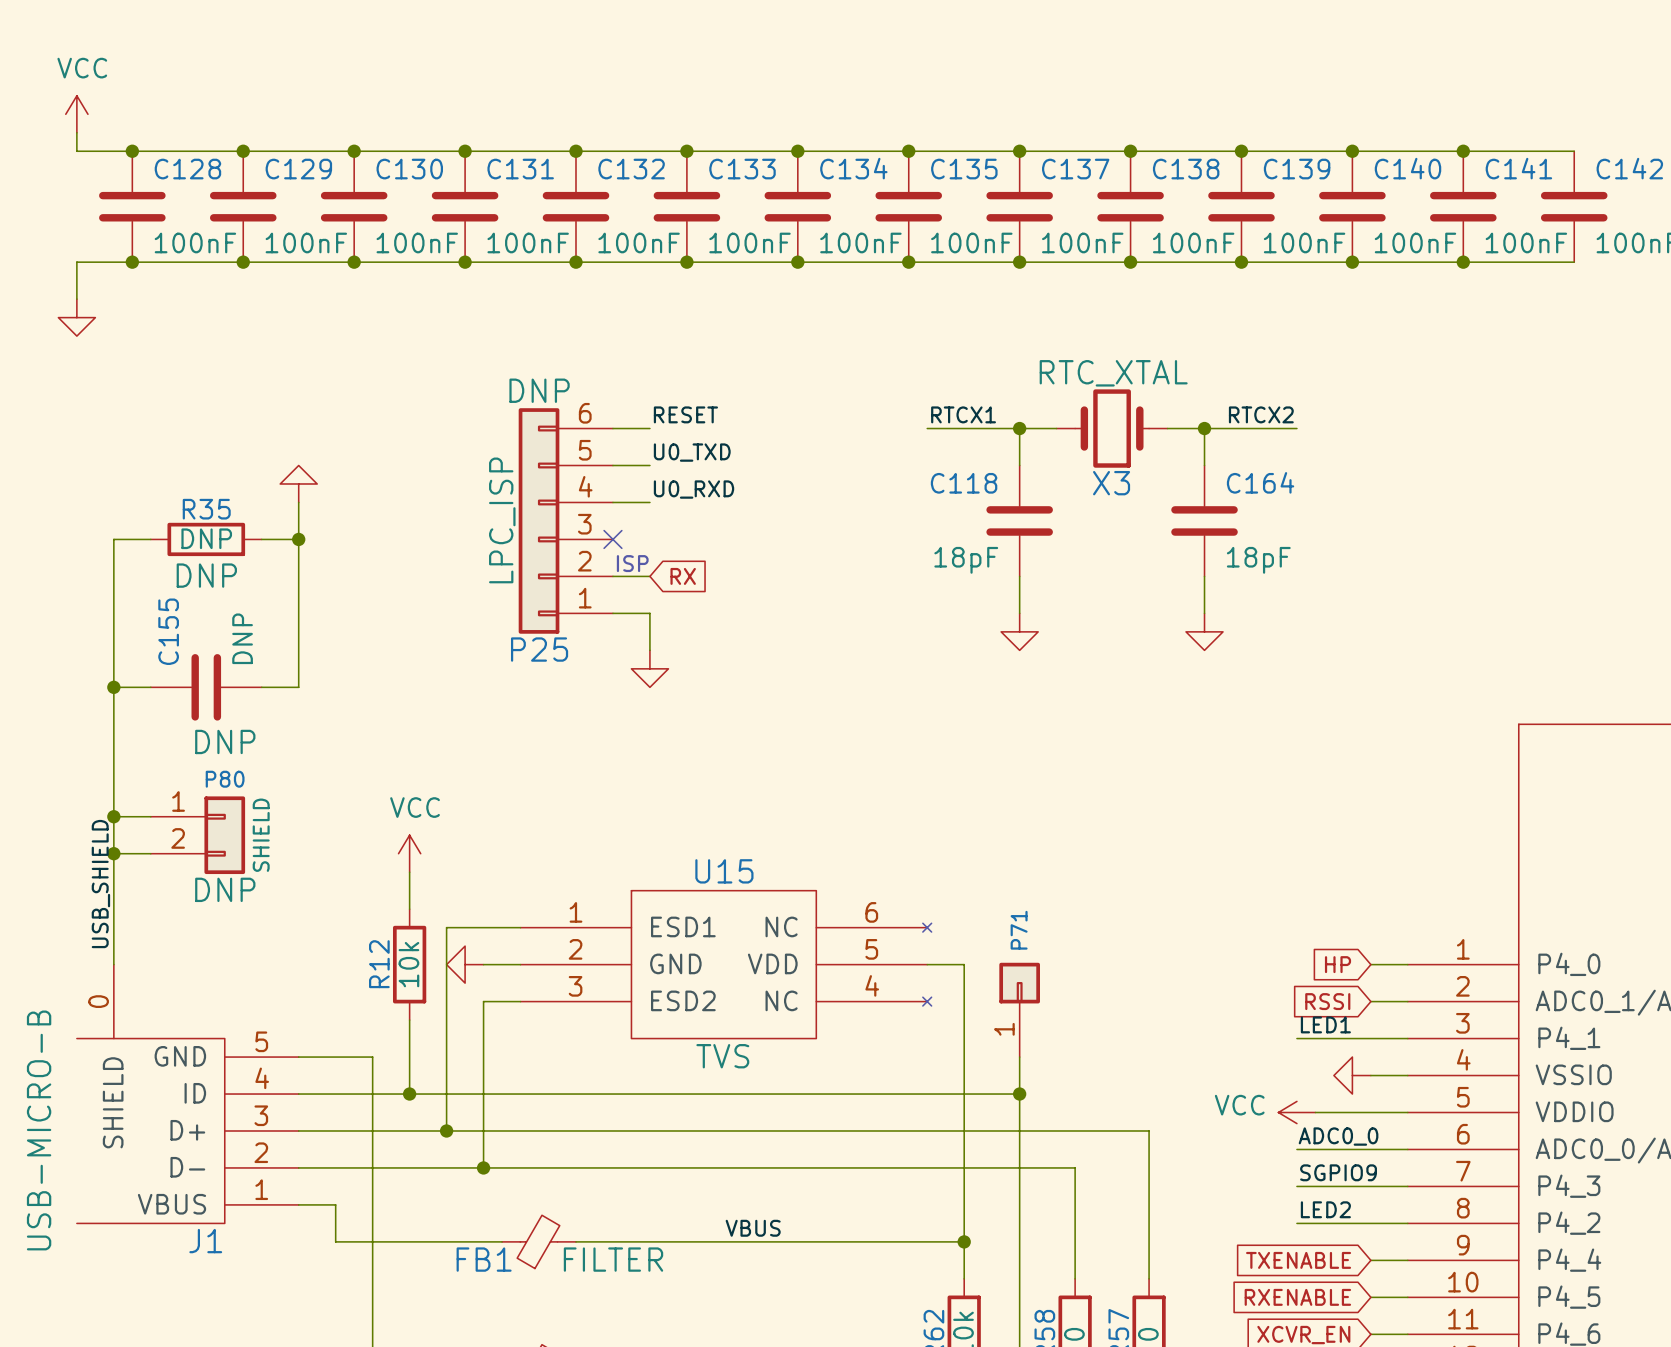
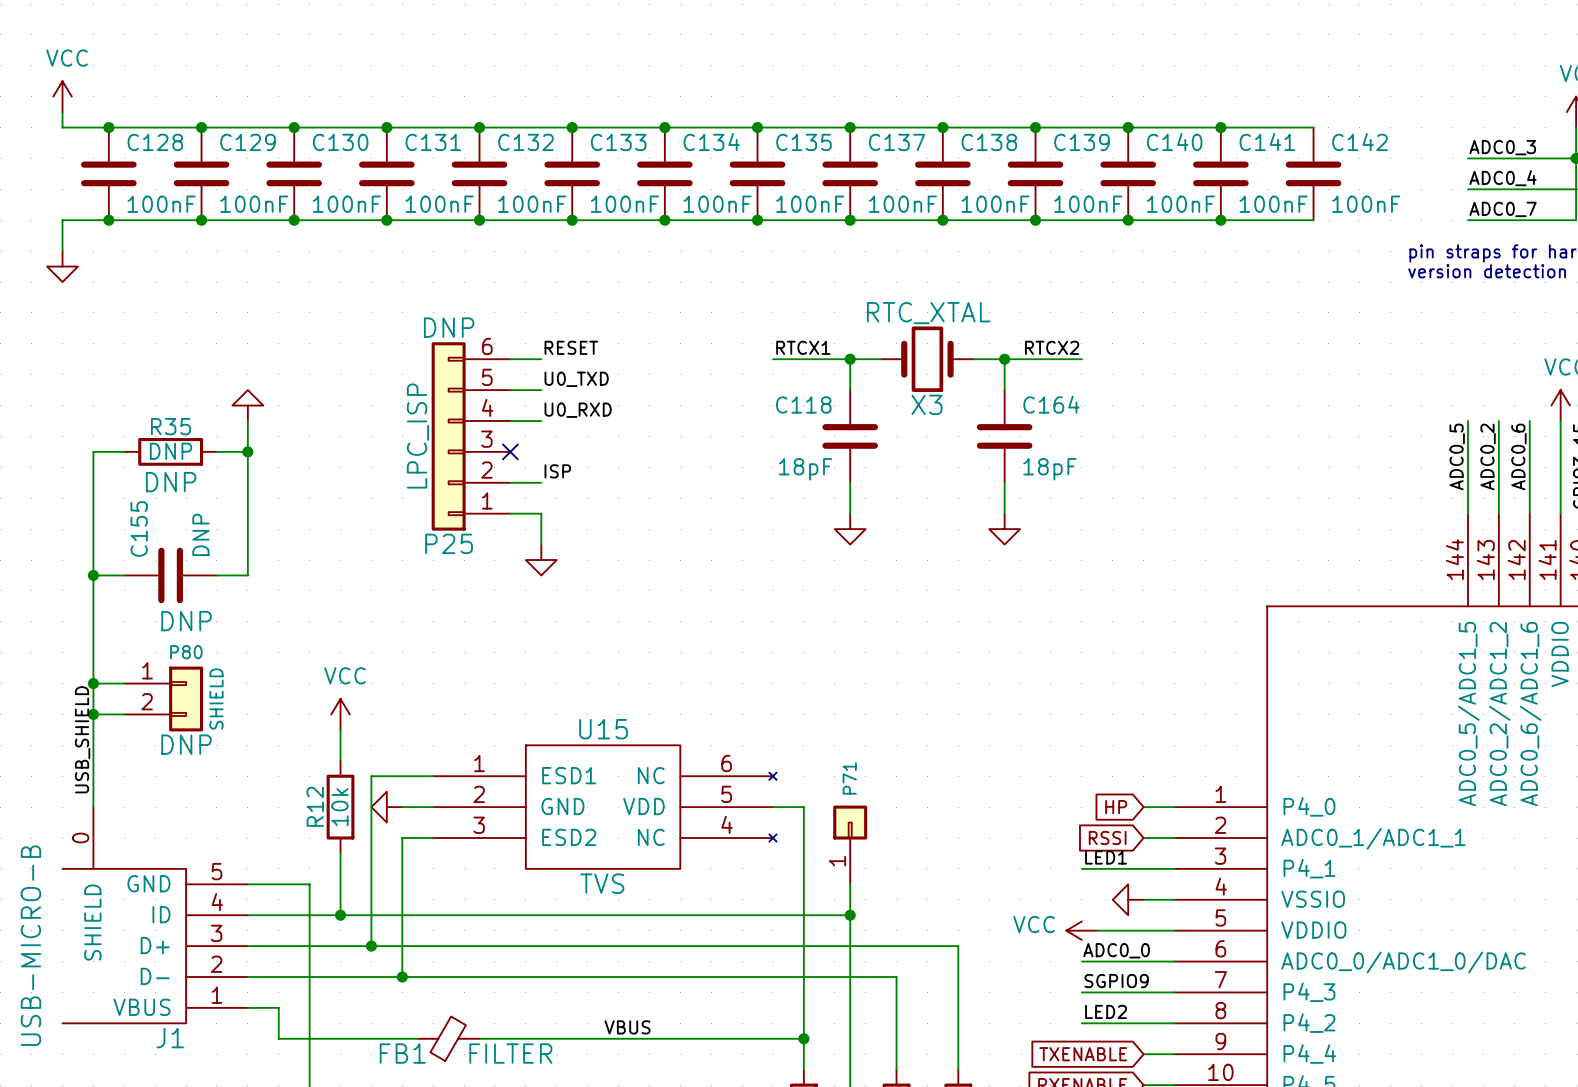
label: none -> ISP (557, 471)
text: ISP (632, 563) -> none
global label: RX (683, 576) -> none

